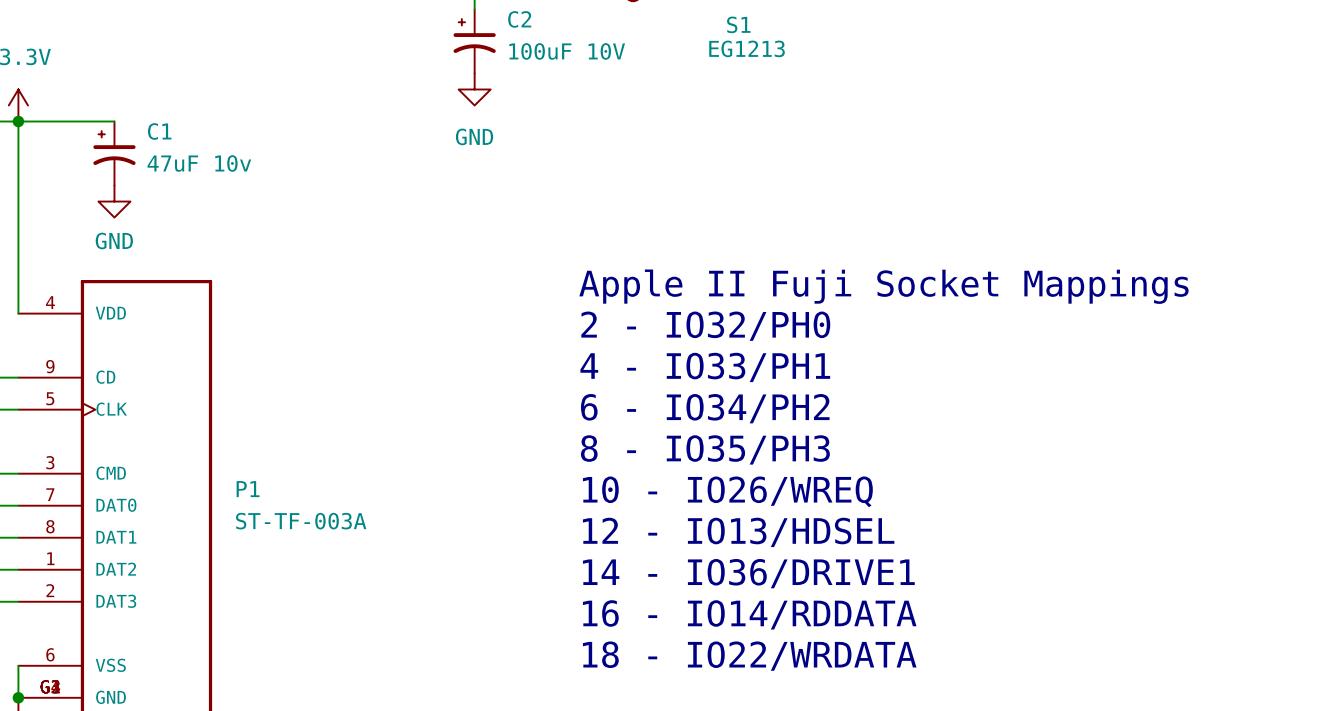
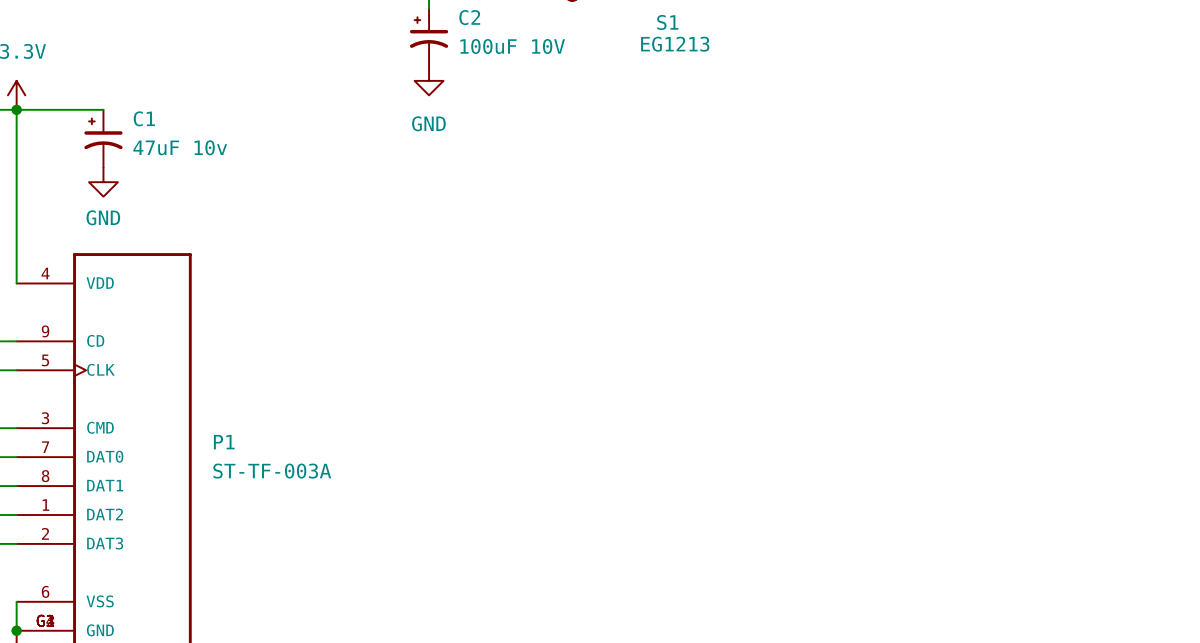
text: Apple II Fuji Socket Mappings (883, 286) -> none
text: 2 - IO32/PH0 (705, 326) -> none
text: 4 - IO33/PH1 (705, 367) -> none
text: 6 - IO34/PH2 (705, 408) -> none
text: 8 - IO35/PH3 (705, 449) -> none
text: 10 - IO26/WREQ (727, 491) -> none
text: 12 - IO13/HDSEL (738, 532) -> none
text: 14 - IO36/DRIVE1 (748, 573) -> none
text: 16 - IO14/RDDATA (749, 614) -> none
text: 18 - IO22/WRDATA (749, 656) -> none

